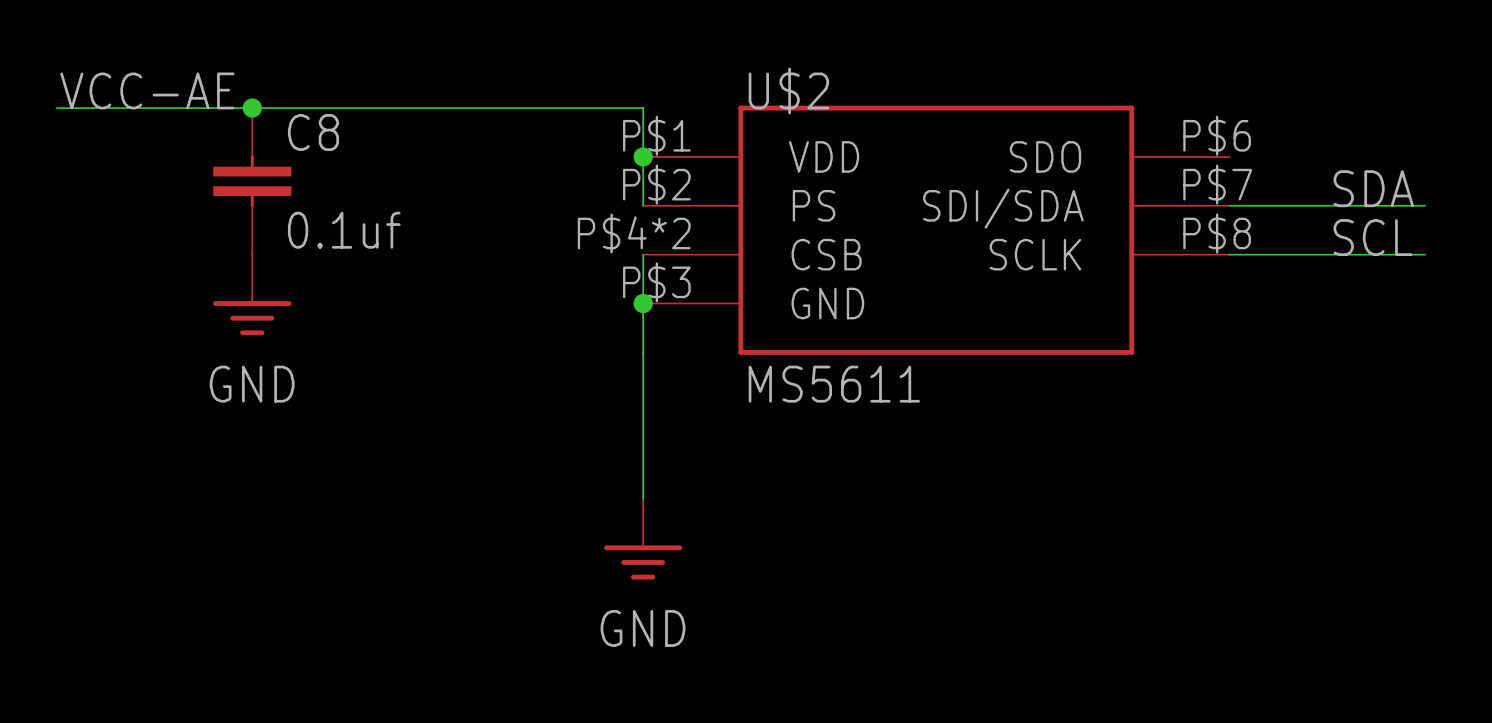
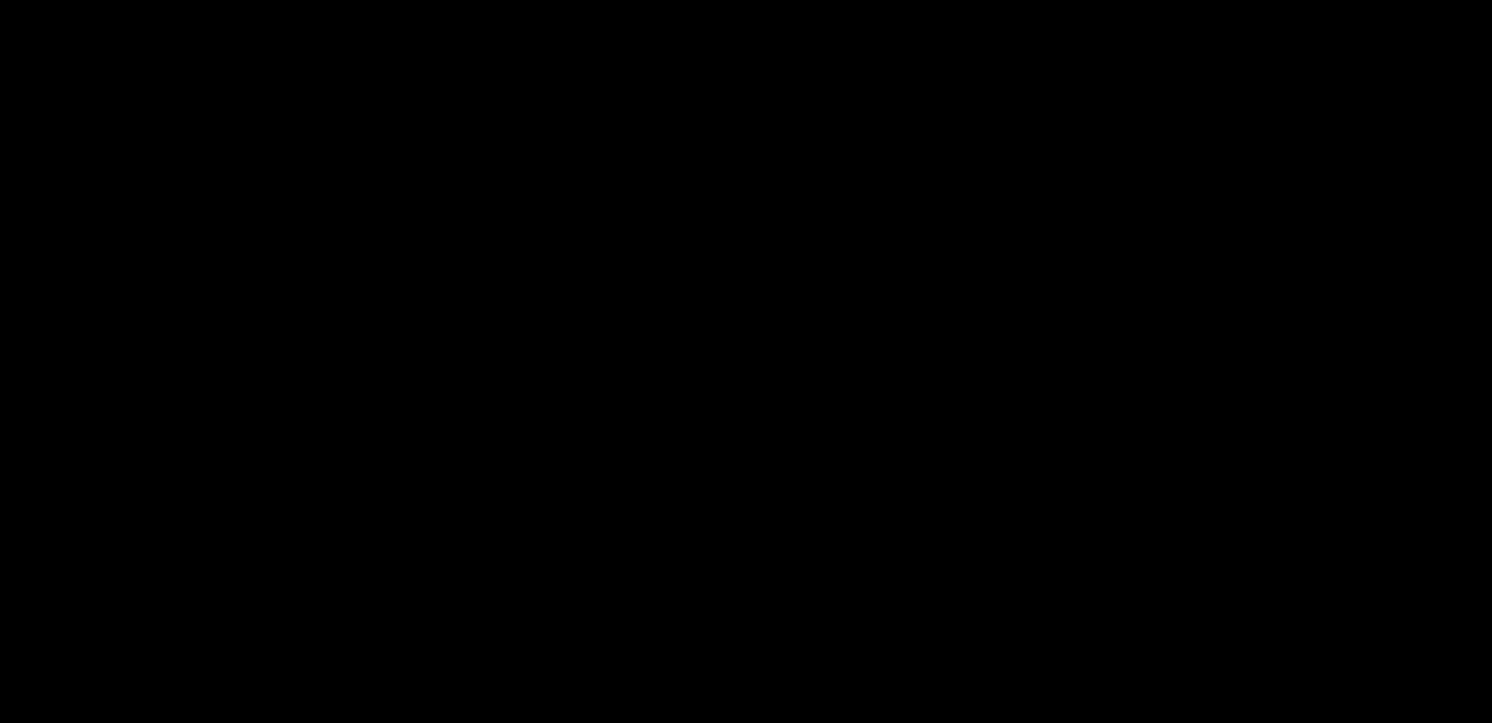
label: VCC-AE (147, 90) -> none
wire: (56, 108) (643, 108) (643, 205) -> none
junction: (252, 108) -> none
junction: (643, 156) -> none
C8: 0.1uf (252, 181) -> none
label: SDA (1373, 188) -> none
wire: (1229, 205) (1424, 205) -> none
U$2: MS5611 (936, 230) -> none
label: SCL (1373, 237) -> none
wire: (643, 254) (643, 498) -> none
wire: (1229, 254) (1424, 254) -> none
power symbol: GND (252, 294) -> none
junction: (643, 303) -> none
power symbol: GND (643, 539) -> none

